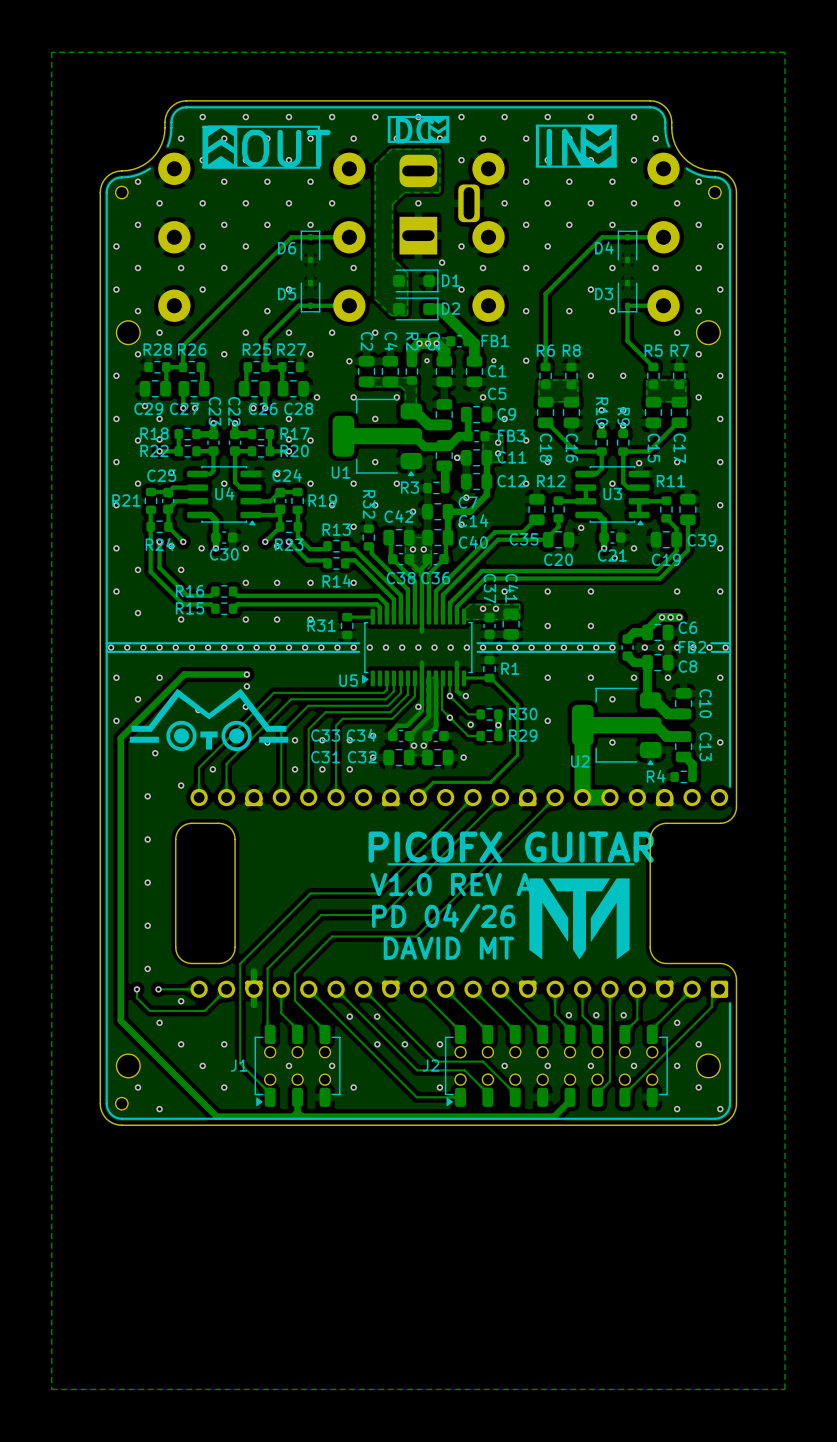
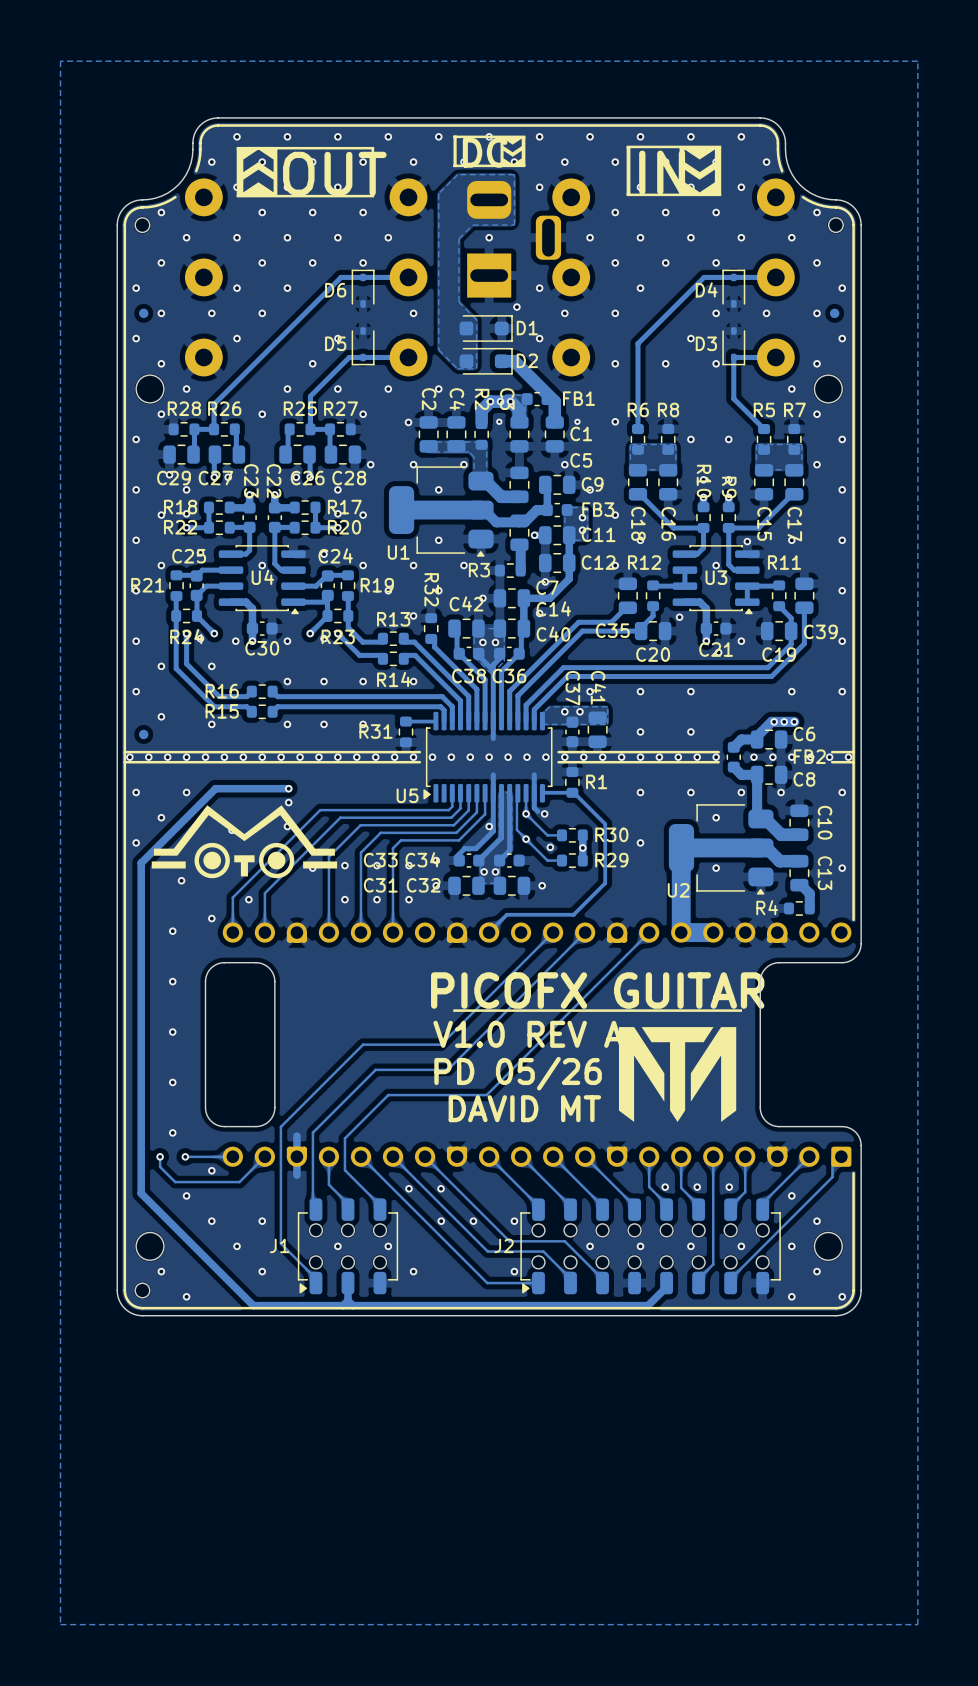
part: none -> (143, 313)
part: none -> (834, 313)
part: none -> (143, 734)
text: PD 04/26 (443, 918) -> PD 05/26 (518, 1073)

